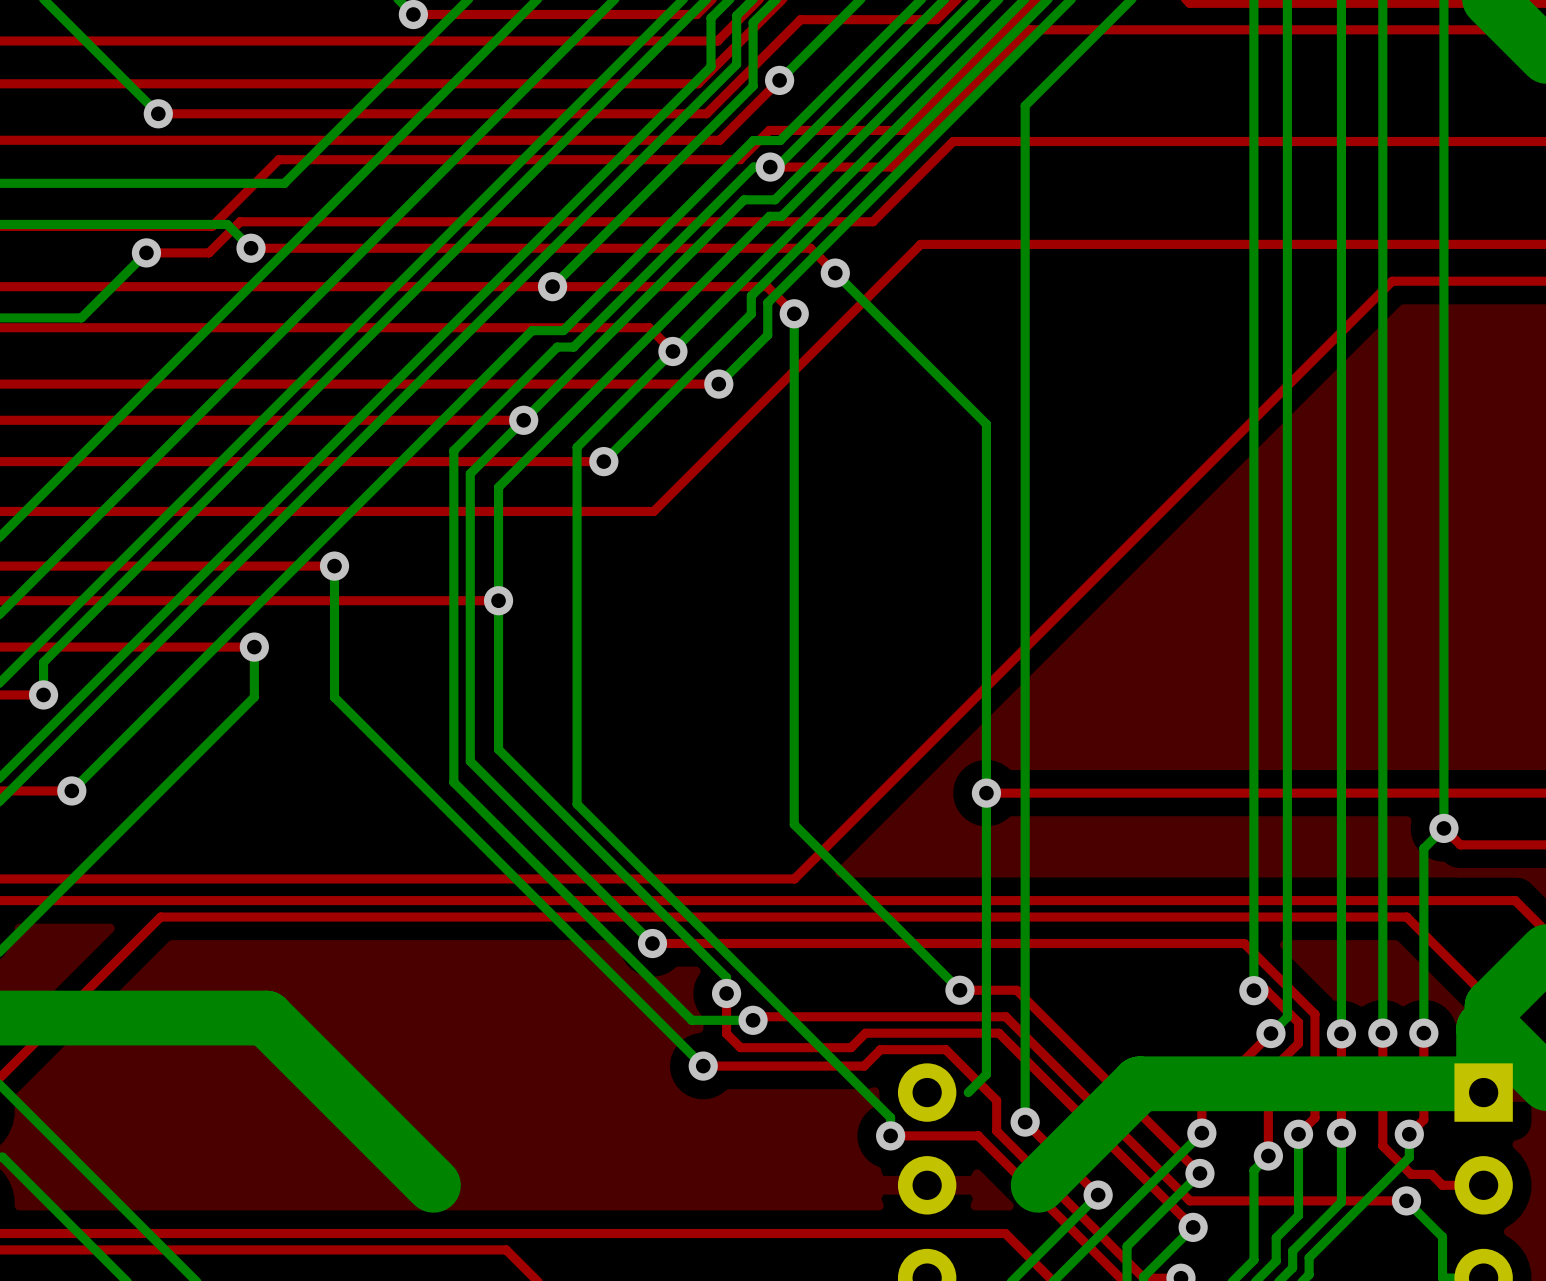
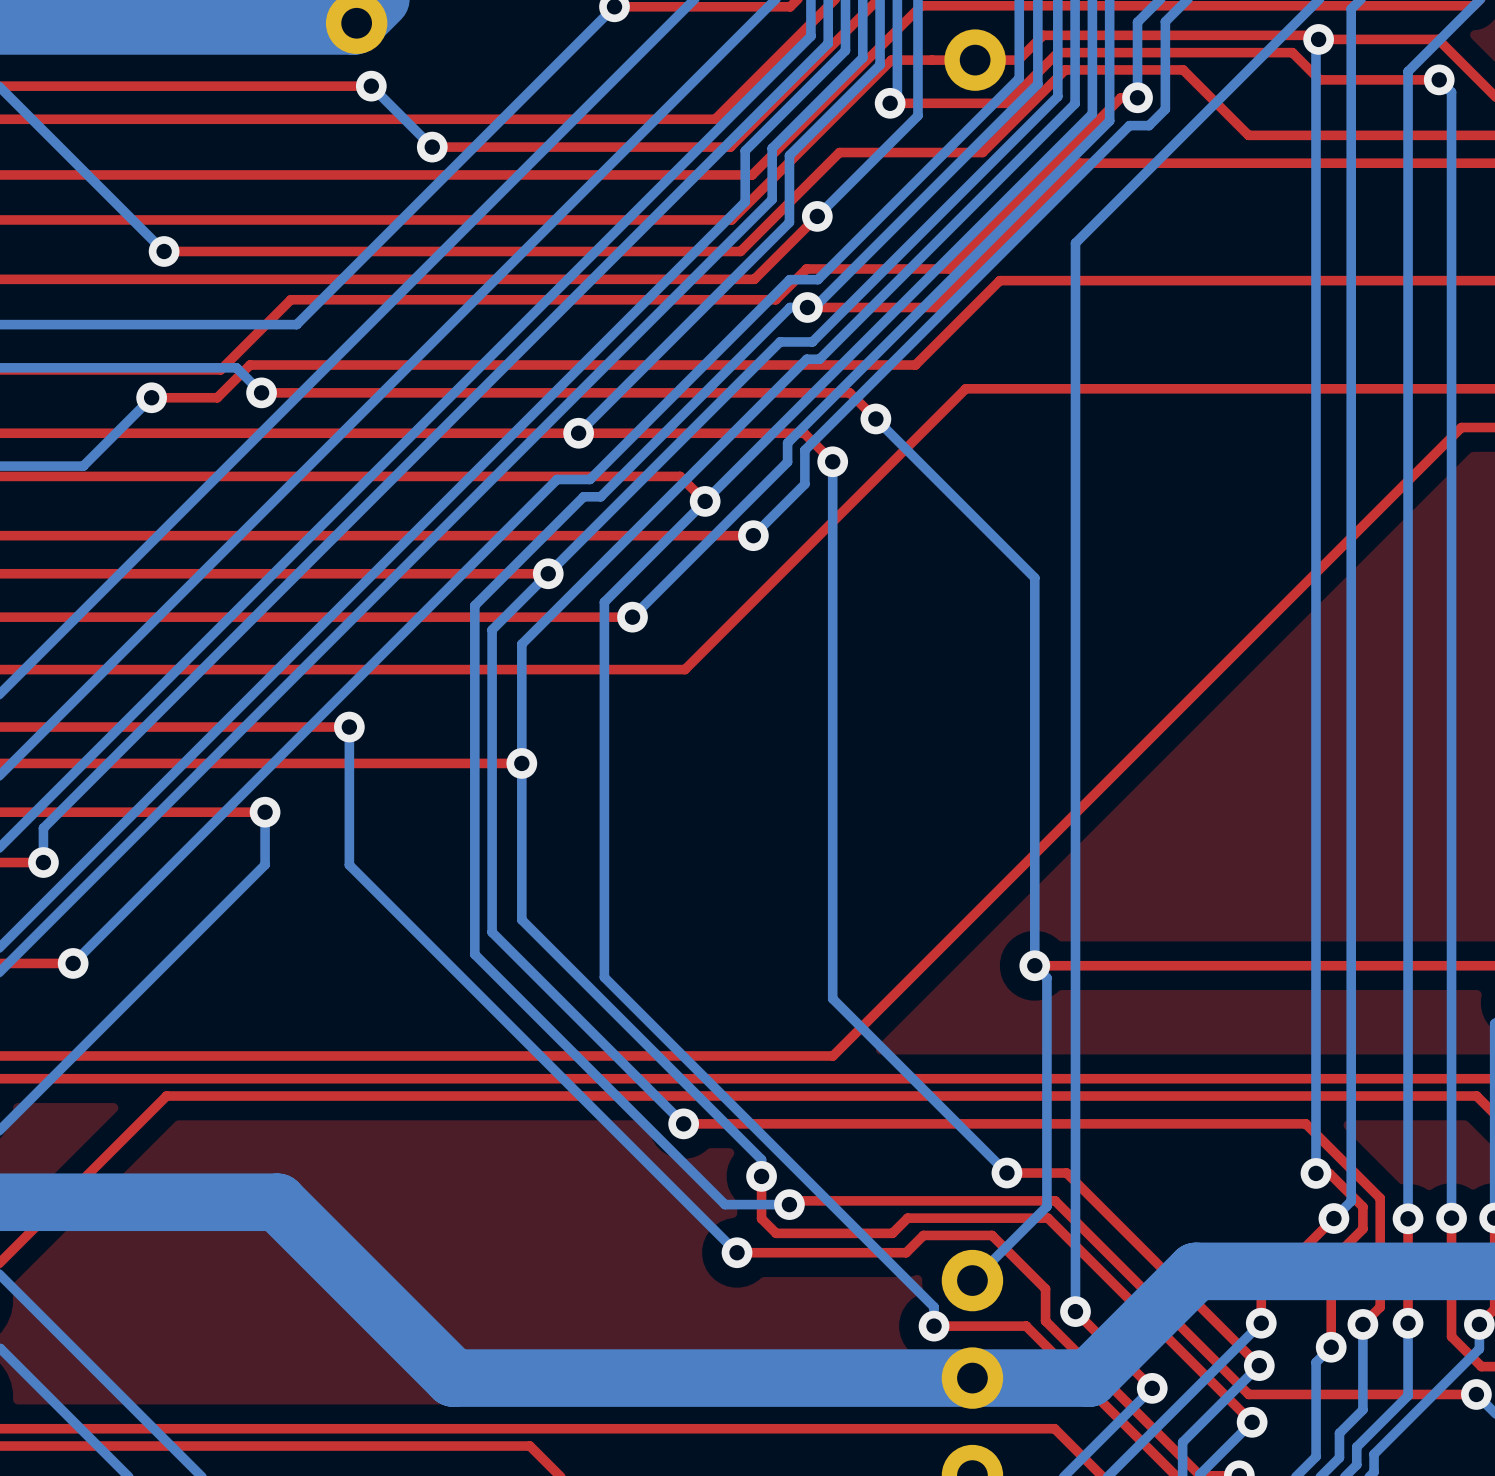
bottom track: (986, 793) (986, 1074) (968, 1092) -> (1034, 965) (1046, 977) (1046, 1206) (972, 1280)
bottom track: none -> (1089, 1378) (453, 1378)

